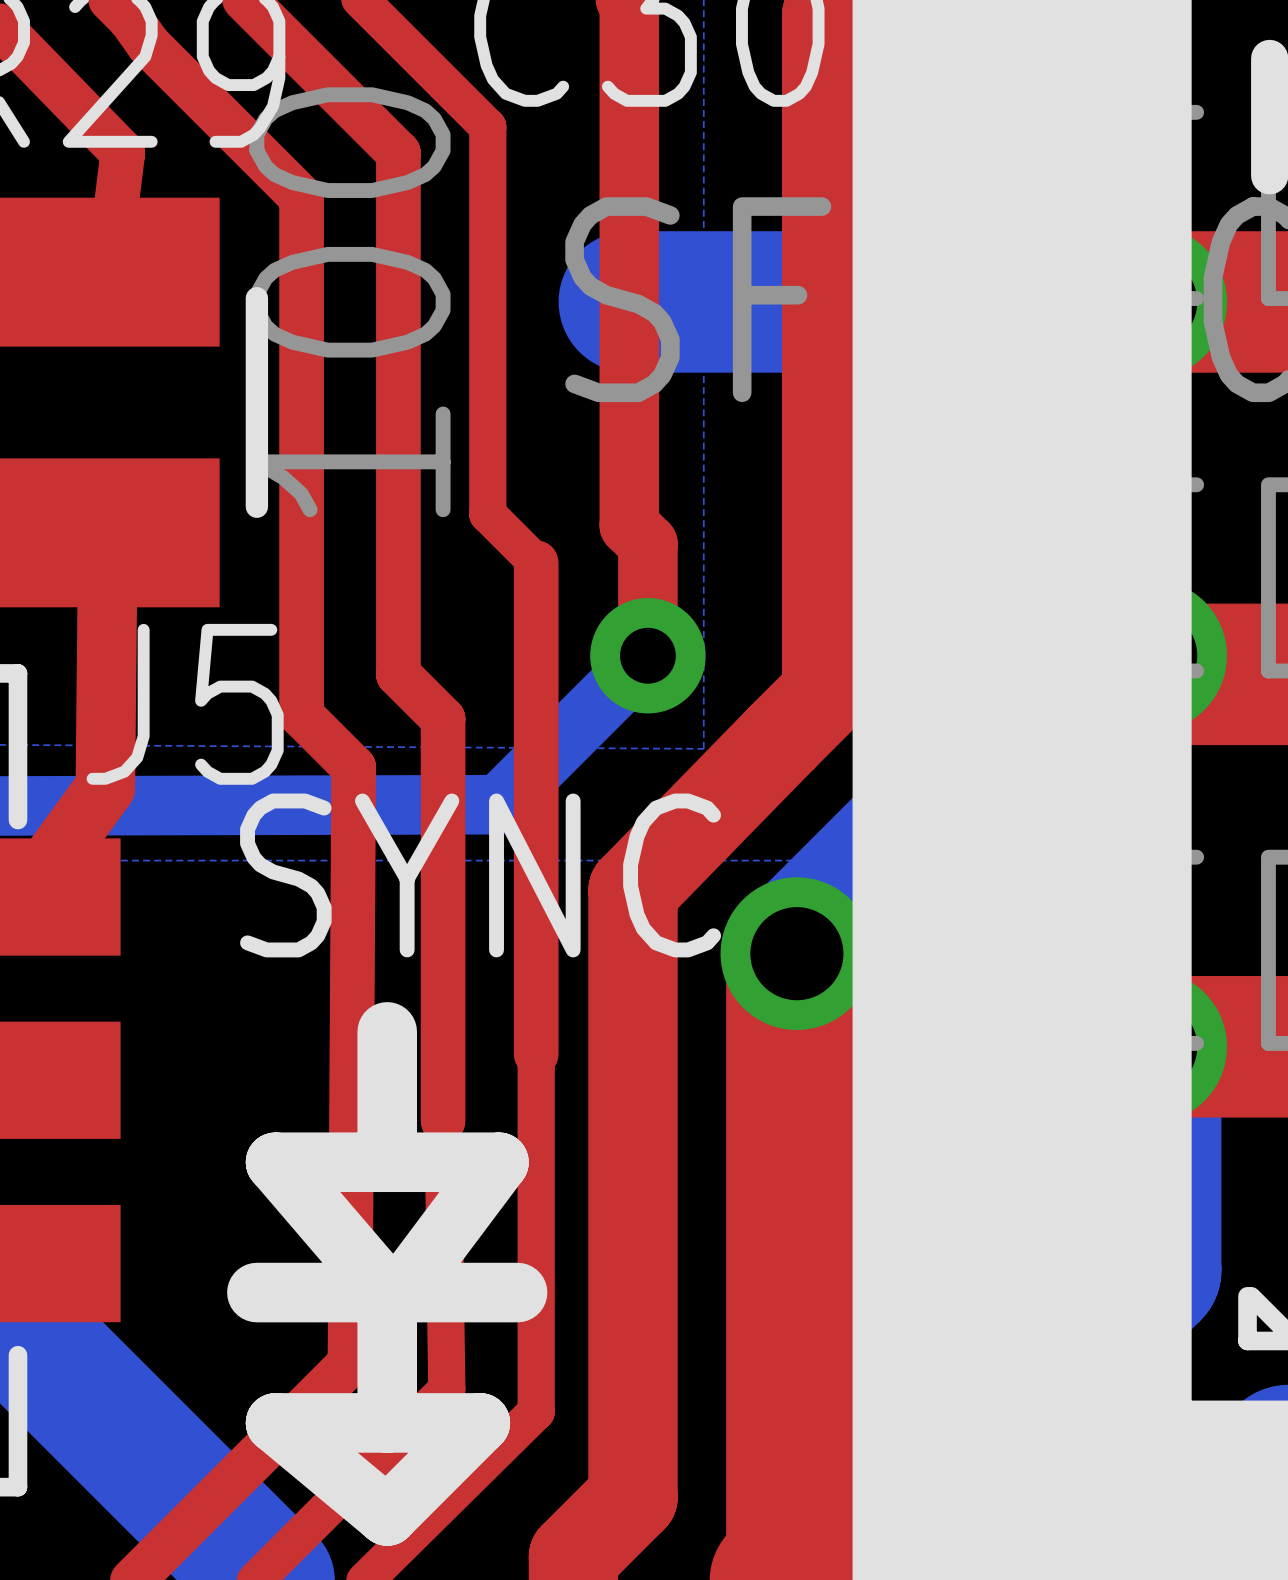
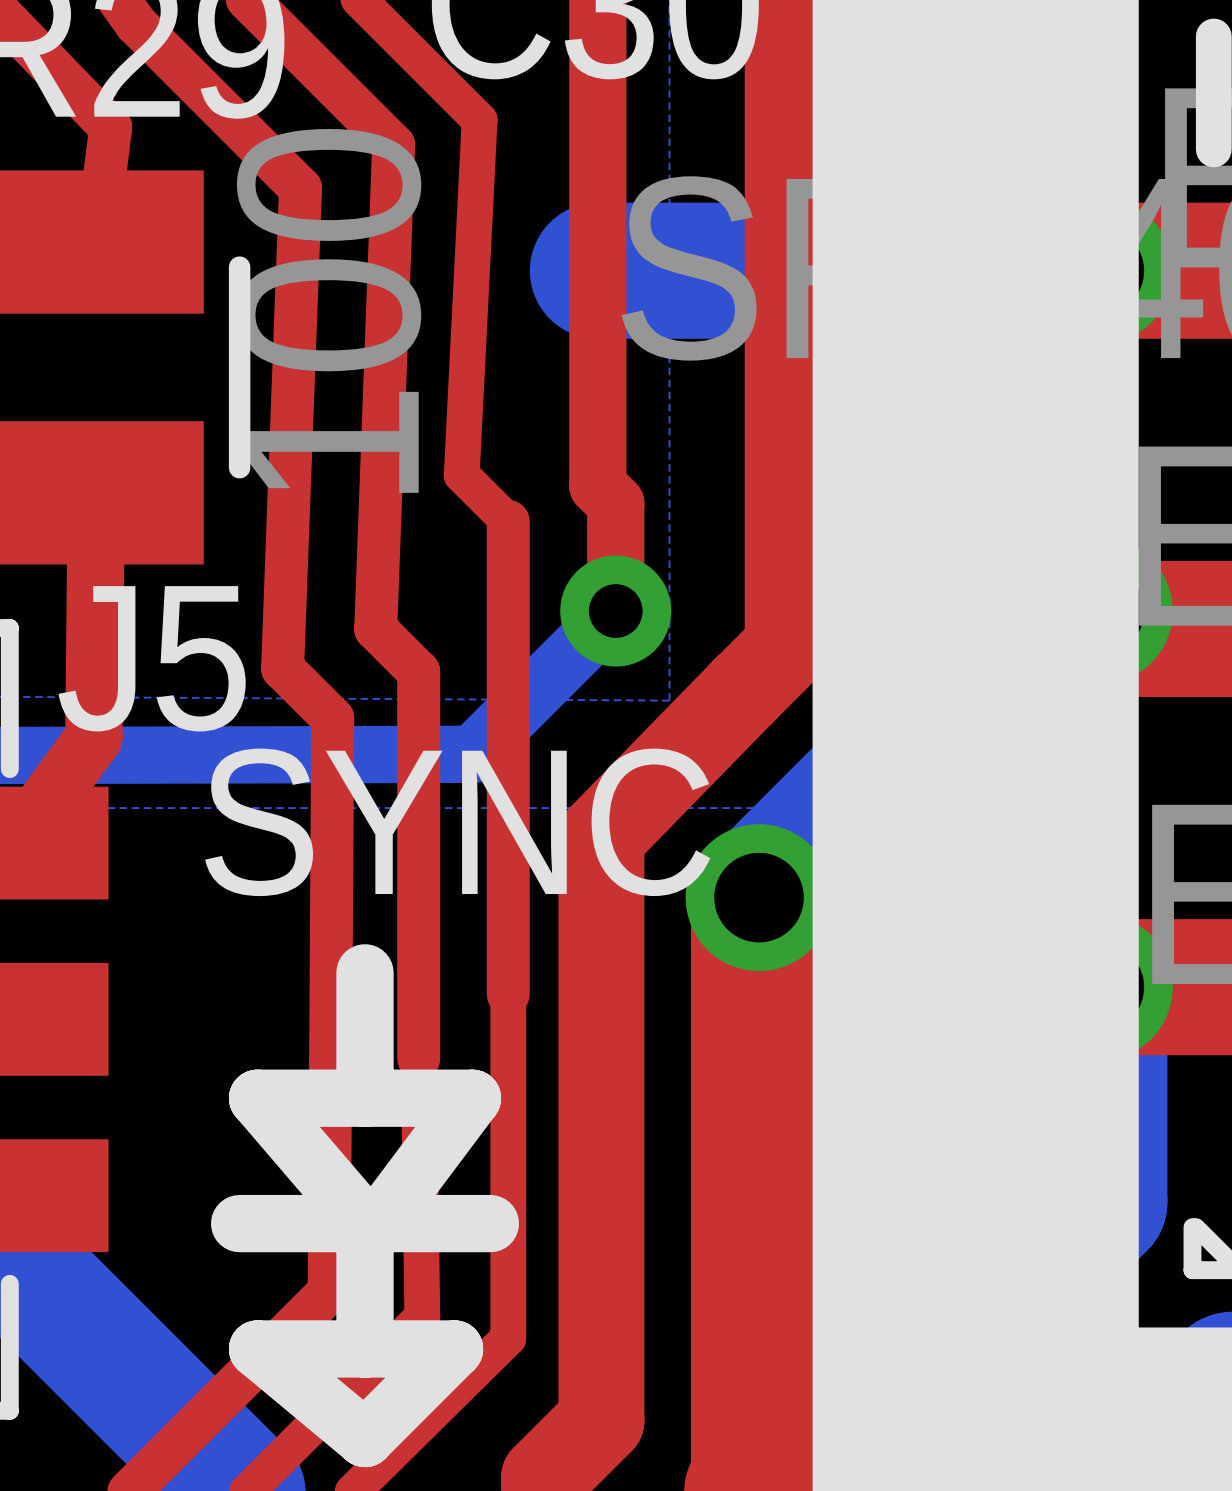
top track: (487, 126) (487, 514) -> (461, 102) (479, 120) (461, 474)
top track: (398, 152) (398, 674) -> (375, 127) (393, 145) (375, 628)
top track: (301, 197) (301, 715) -> (282, 170) (300, 188) (282, 668)

